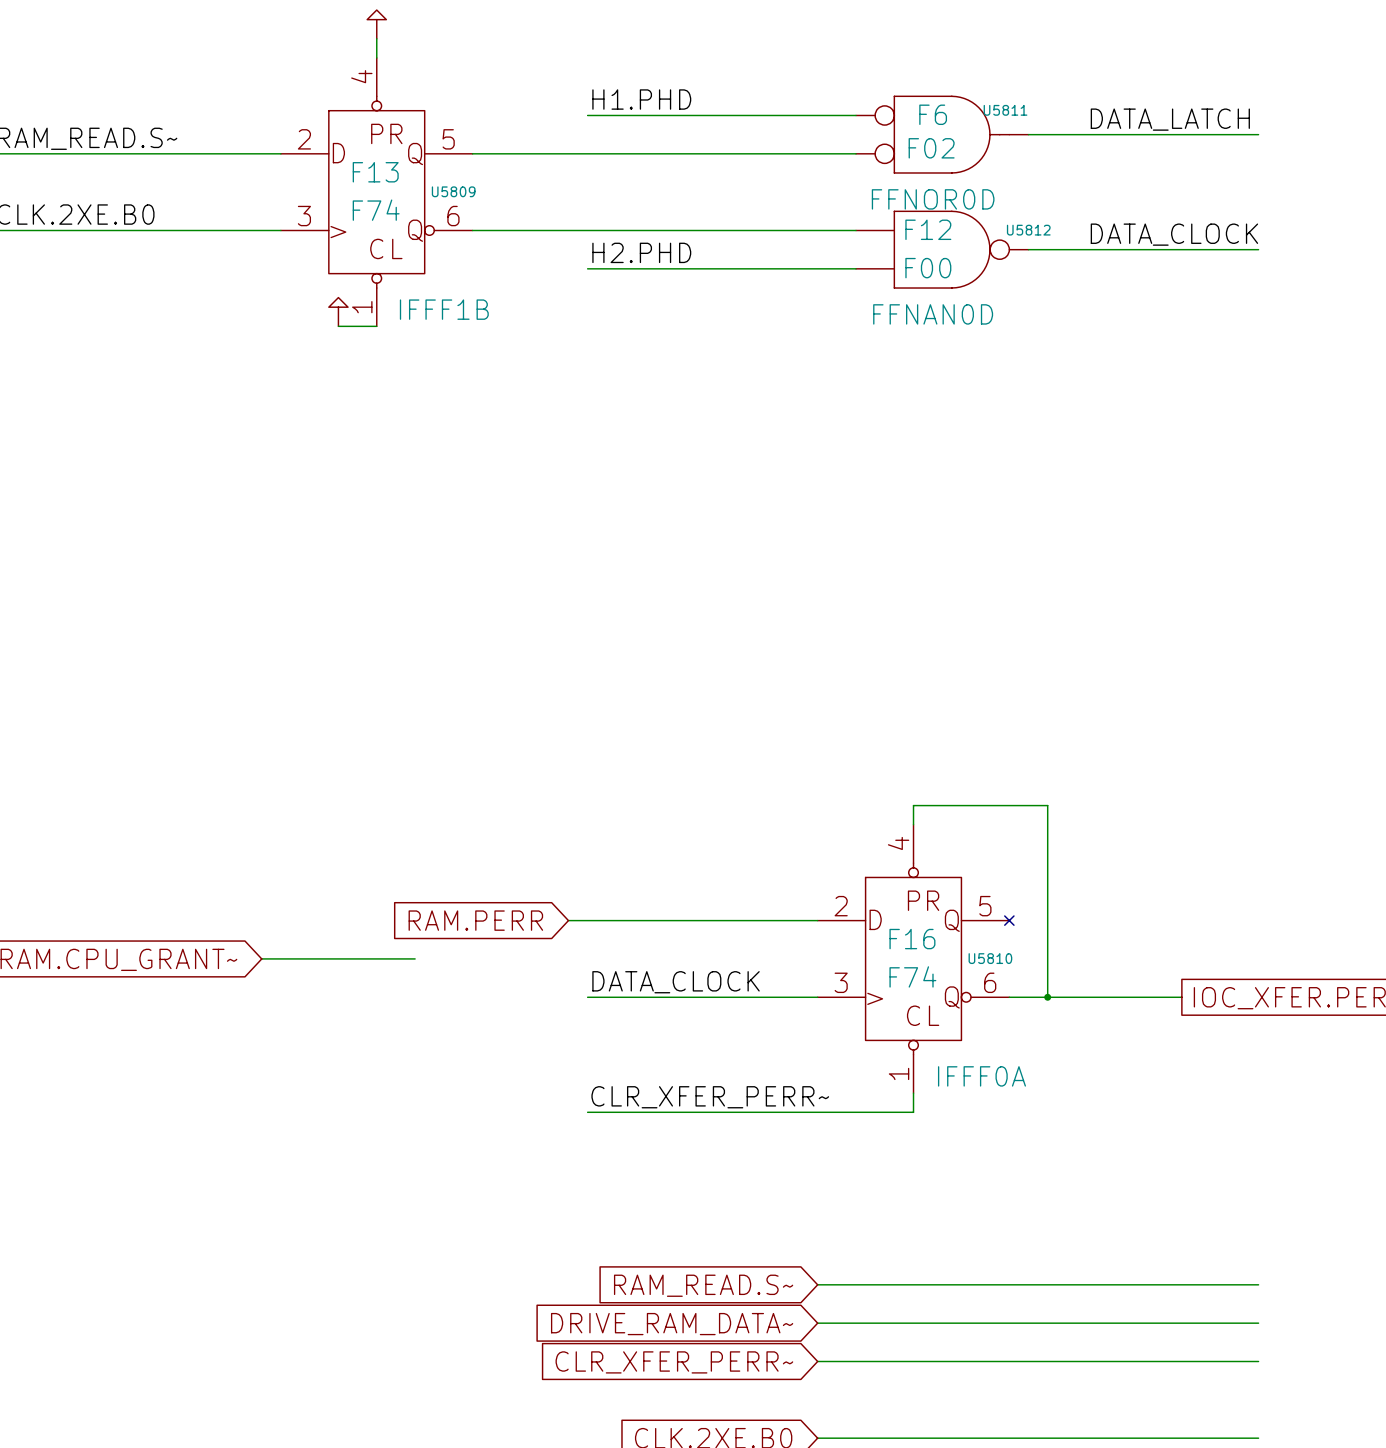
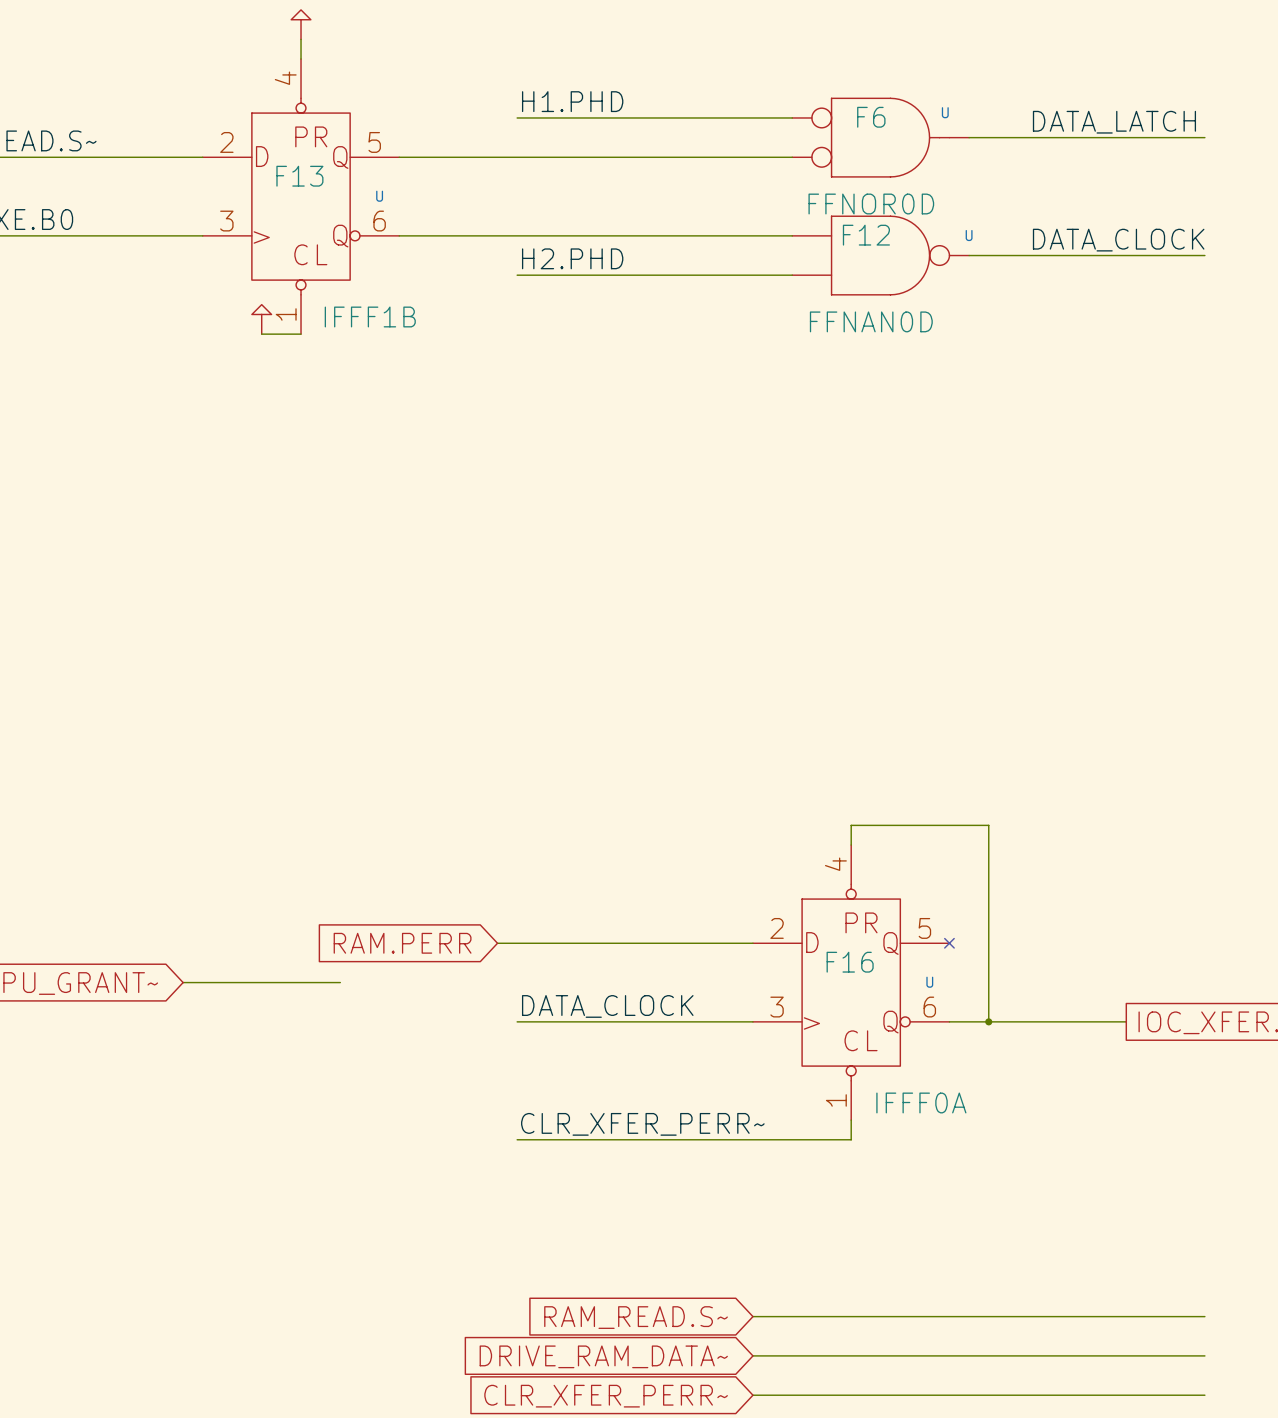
U5811 name: U5811 (1005, 110) -> U (945, 112)
U5811 value: F02 (931, 148) -> none
U5809 name: U5809 (453, 191) -> U (379, 196)
U5809 value: F74 (376, 210) -> none
U5812 name: U5812 (1028, 230) -> U (969, 235)
U5812 value: F00 (928, 268) -> none
U5810 name: U5810 (990, 958) -> U (929, 982)
U5810 value: F74 (912, 976) -> none

